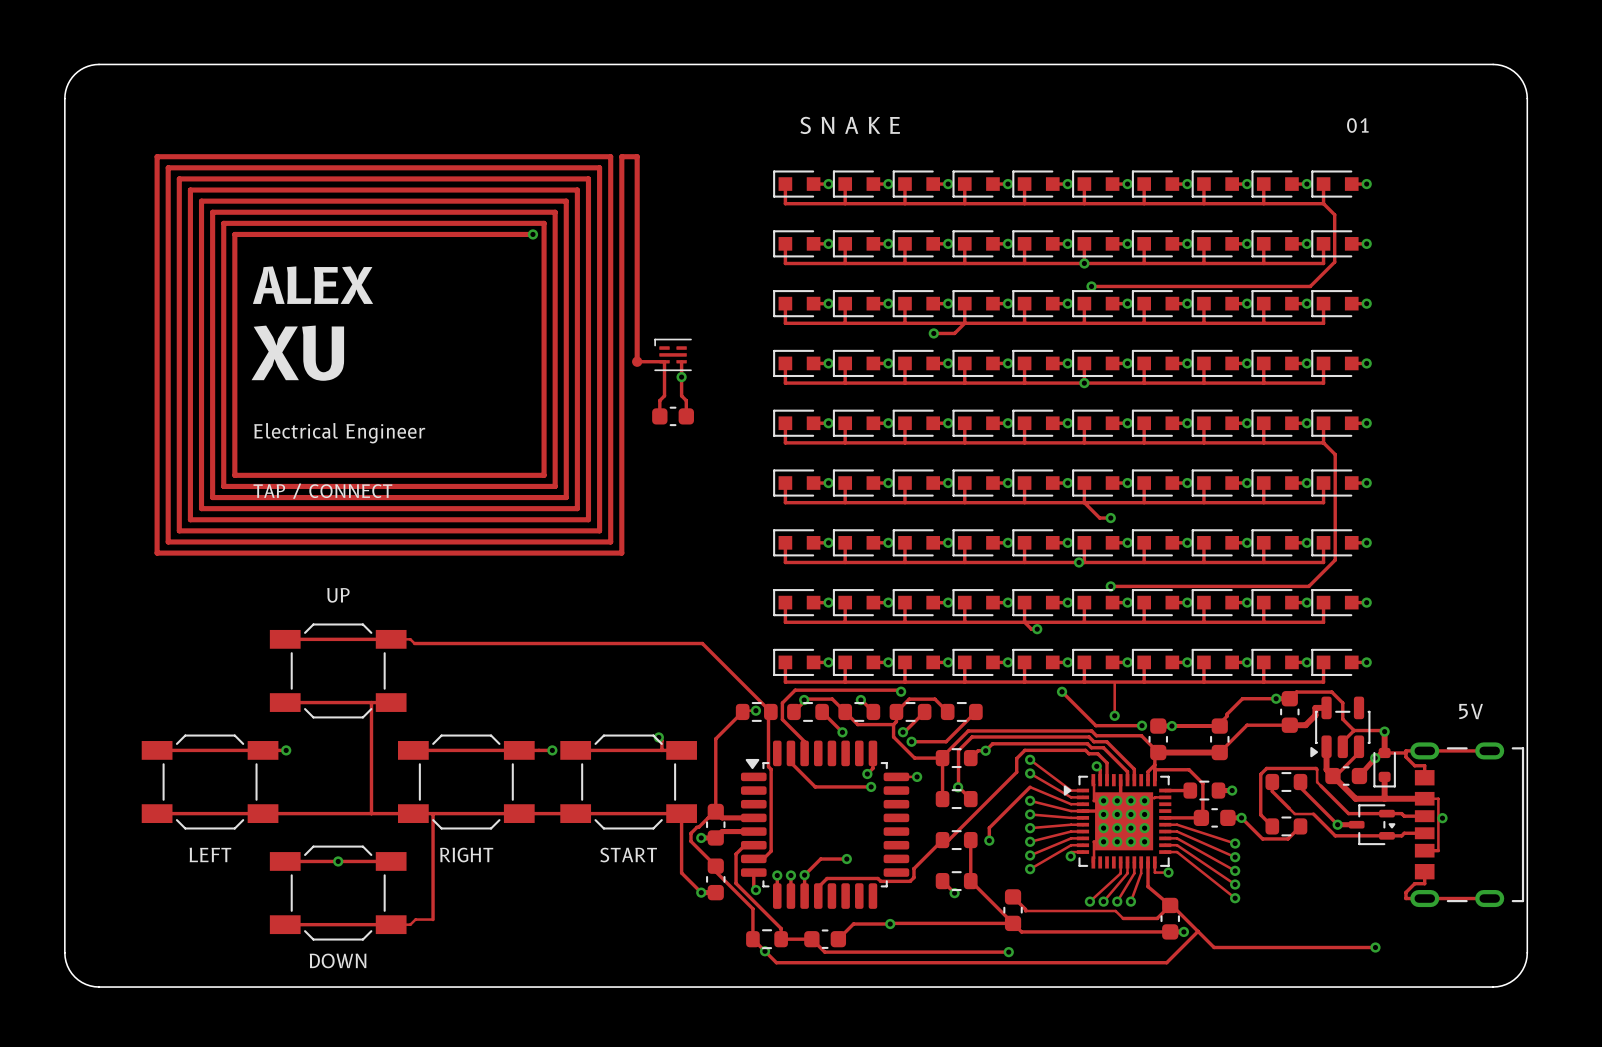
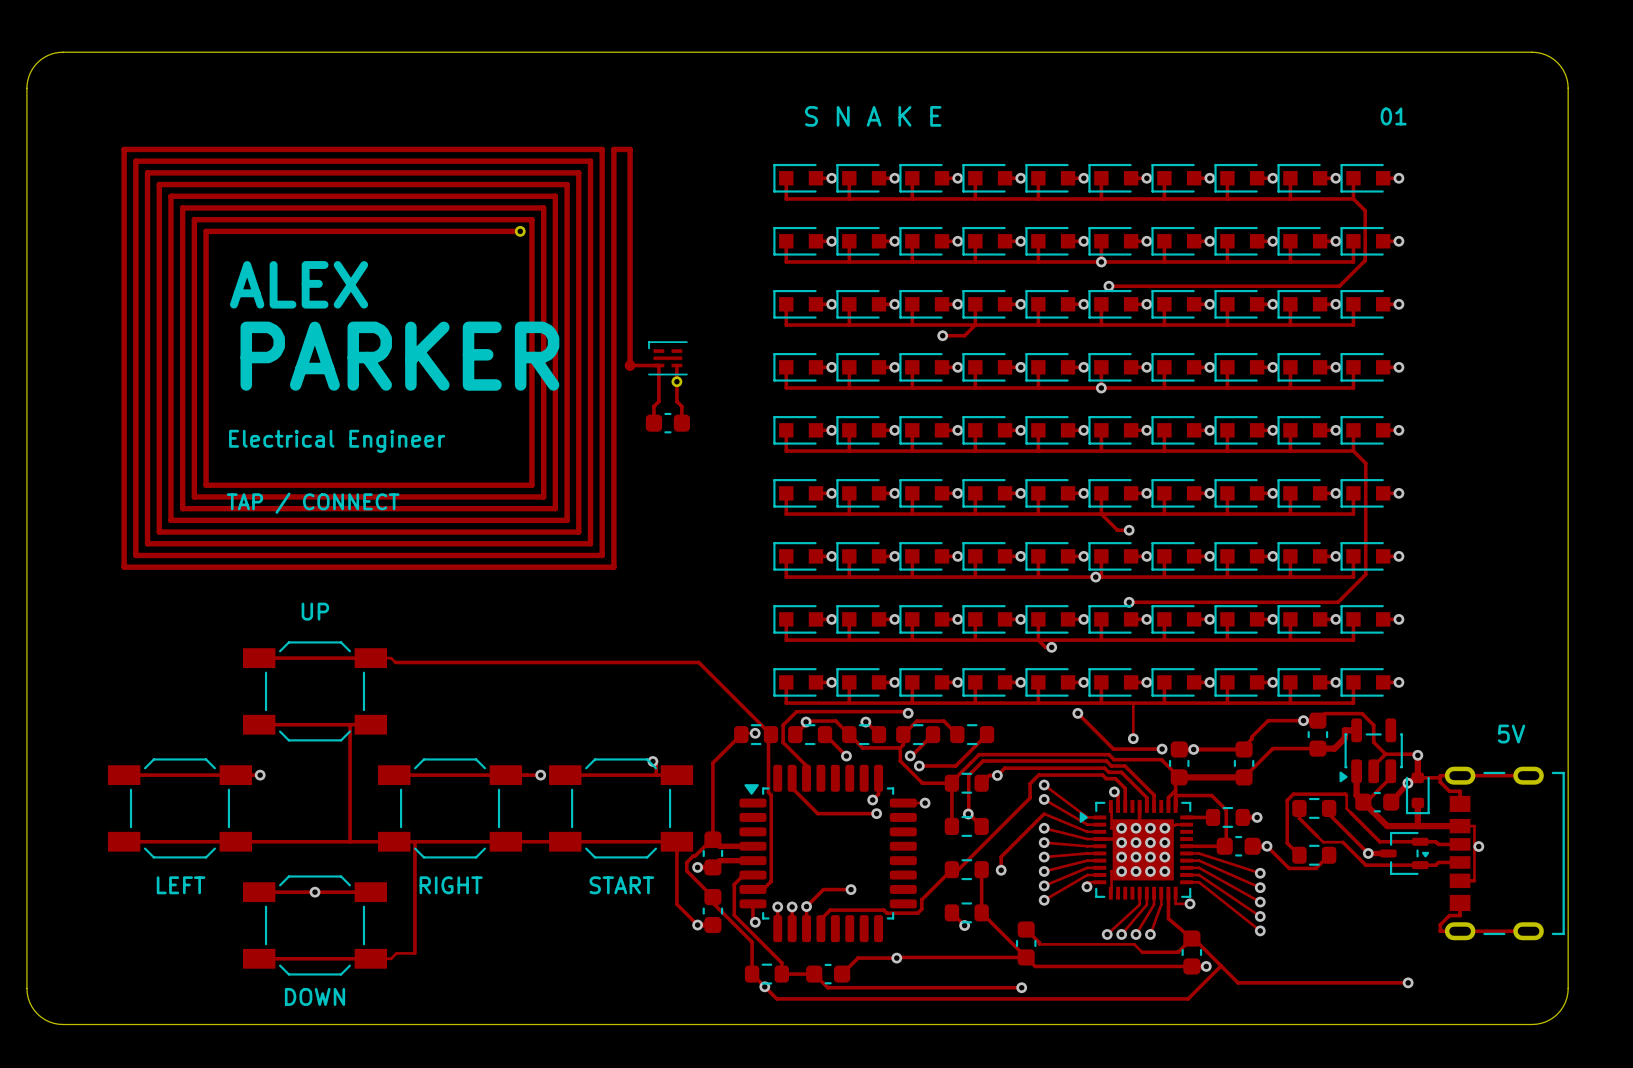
text: XU (297, 353) -> PARKER (399, 356)

